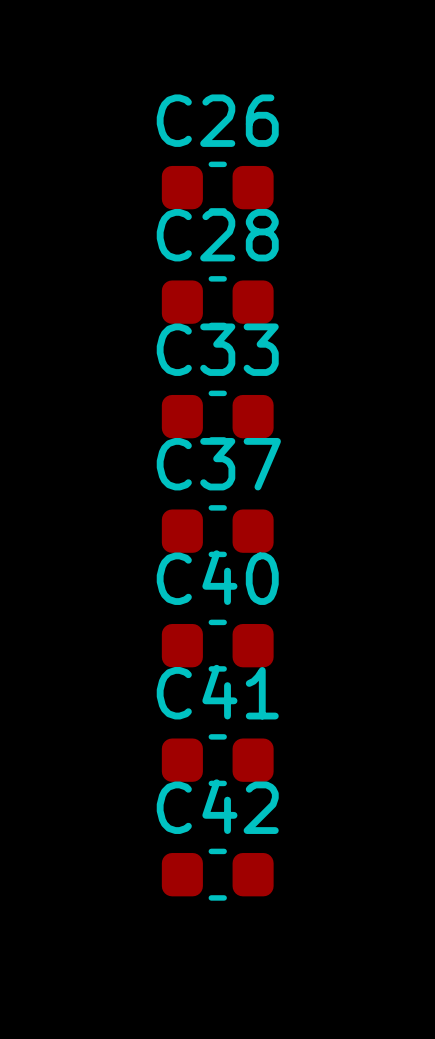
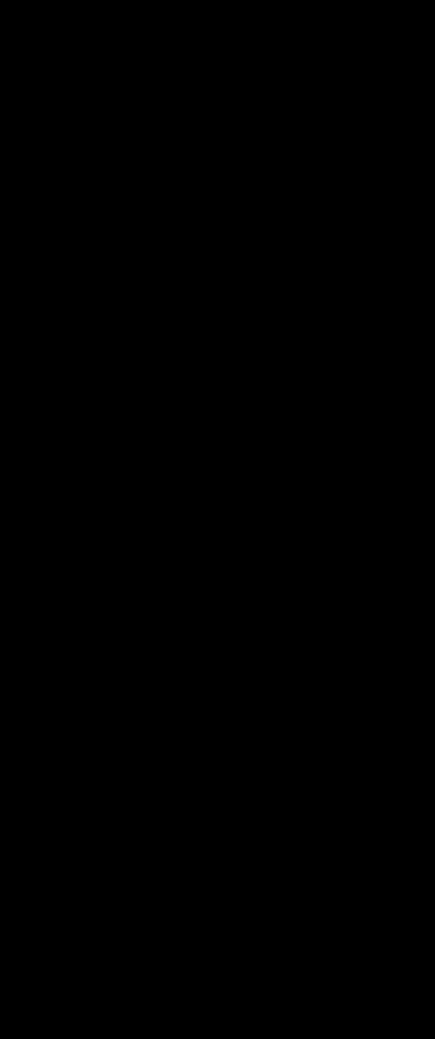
C26: (217, 187) -> none
C28: (217, 302) -> none
C33: (217, 416) -> none
C37: (217, 531) -> none
C40: (217, 645) -> none
C41: (217, 760) -> none
C42: (217, 874) -> none

